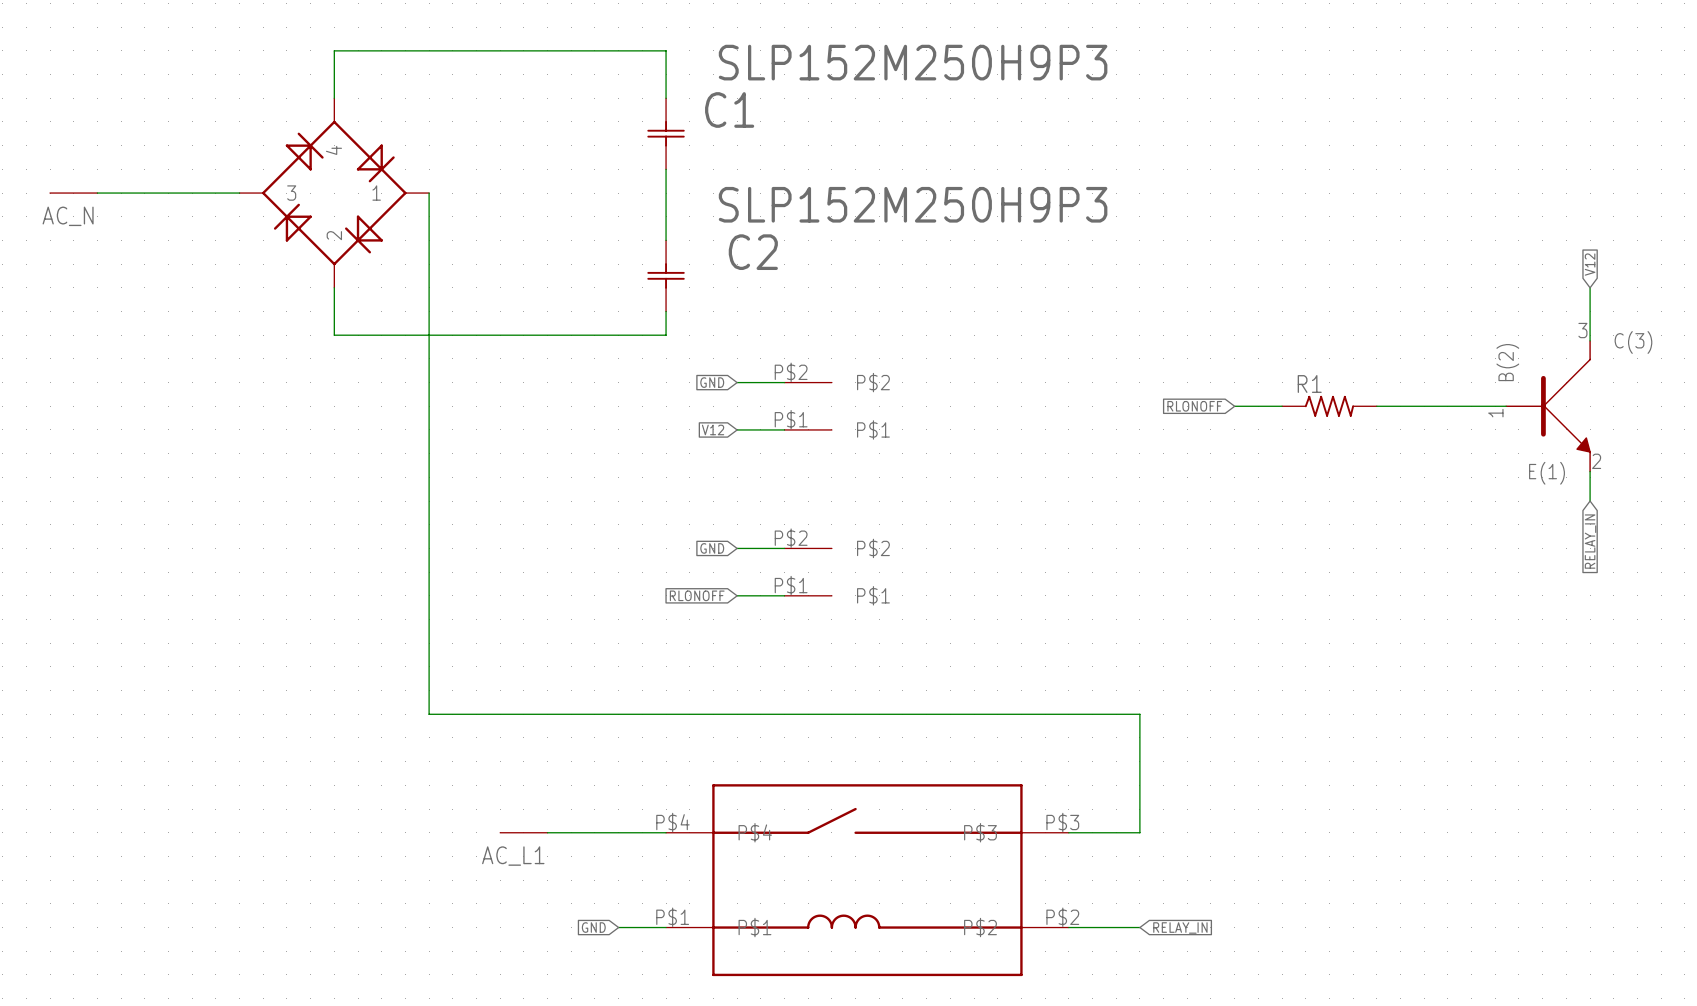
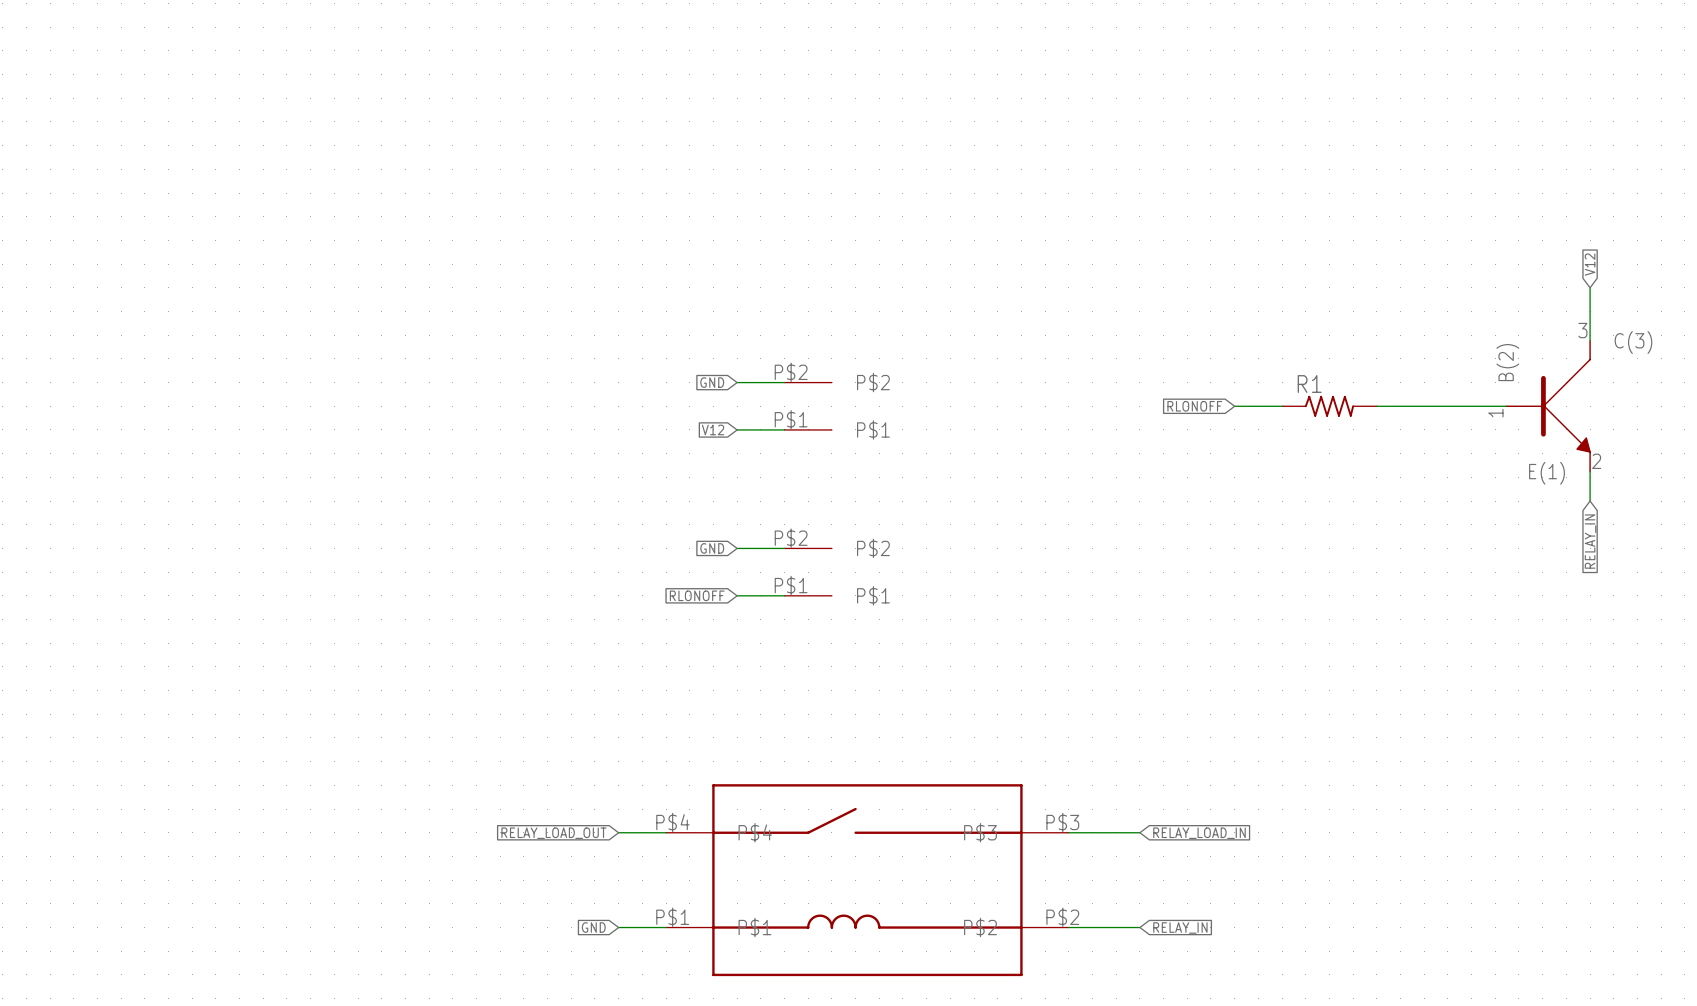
wire: (334, 98) (334, 50) (666, 50) (666, 98) -> none
C1: SLP152M250H9P3 (666, 133) -> none
wire: (666, 169) (666, 240) -> none
AC_N: (73, 193) -> none
wire: (97, 193) (239, 193) -> none
part: (334, 193) -> none
wire: (429, 193) (429, 714) (1139, 714) (1139, 832) -> none
C2: SLP152M250H9P3 (666, 275) -> none
wire: (334, 287) (334, 335) (666, 335) (666, 311) -> none
AC_L1: (523, 832) -> none
wire: (547, 832) (618, 832) -> none
global label: none -> RELAY_LOAD_OUT (553, 833)
global label: none -> RELAY_LOAD_IN (1199, 833)

